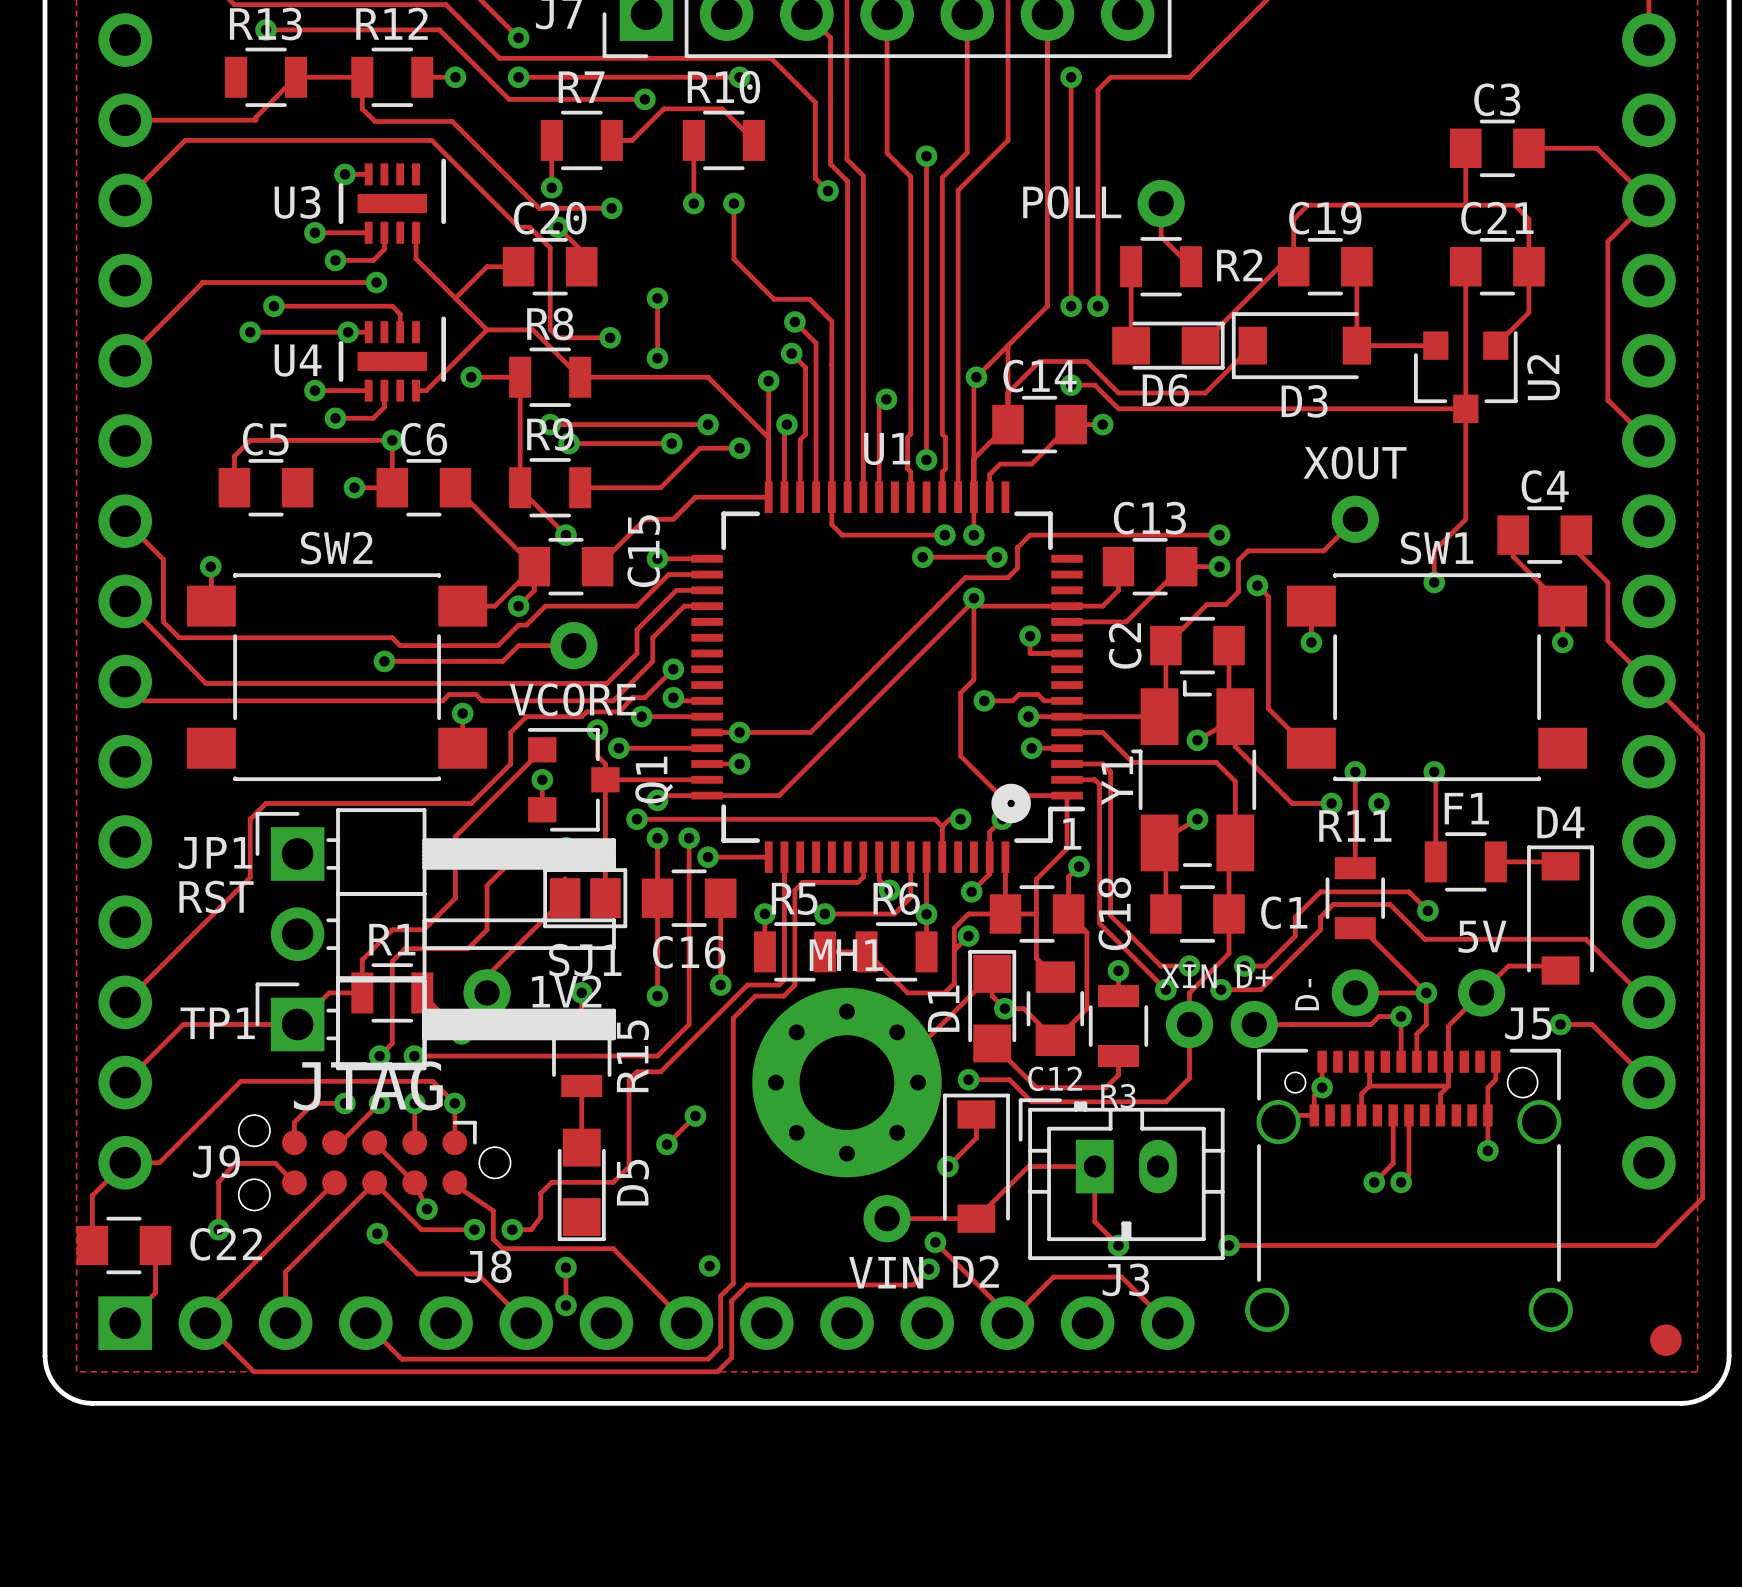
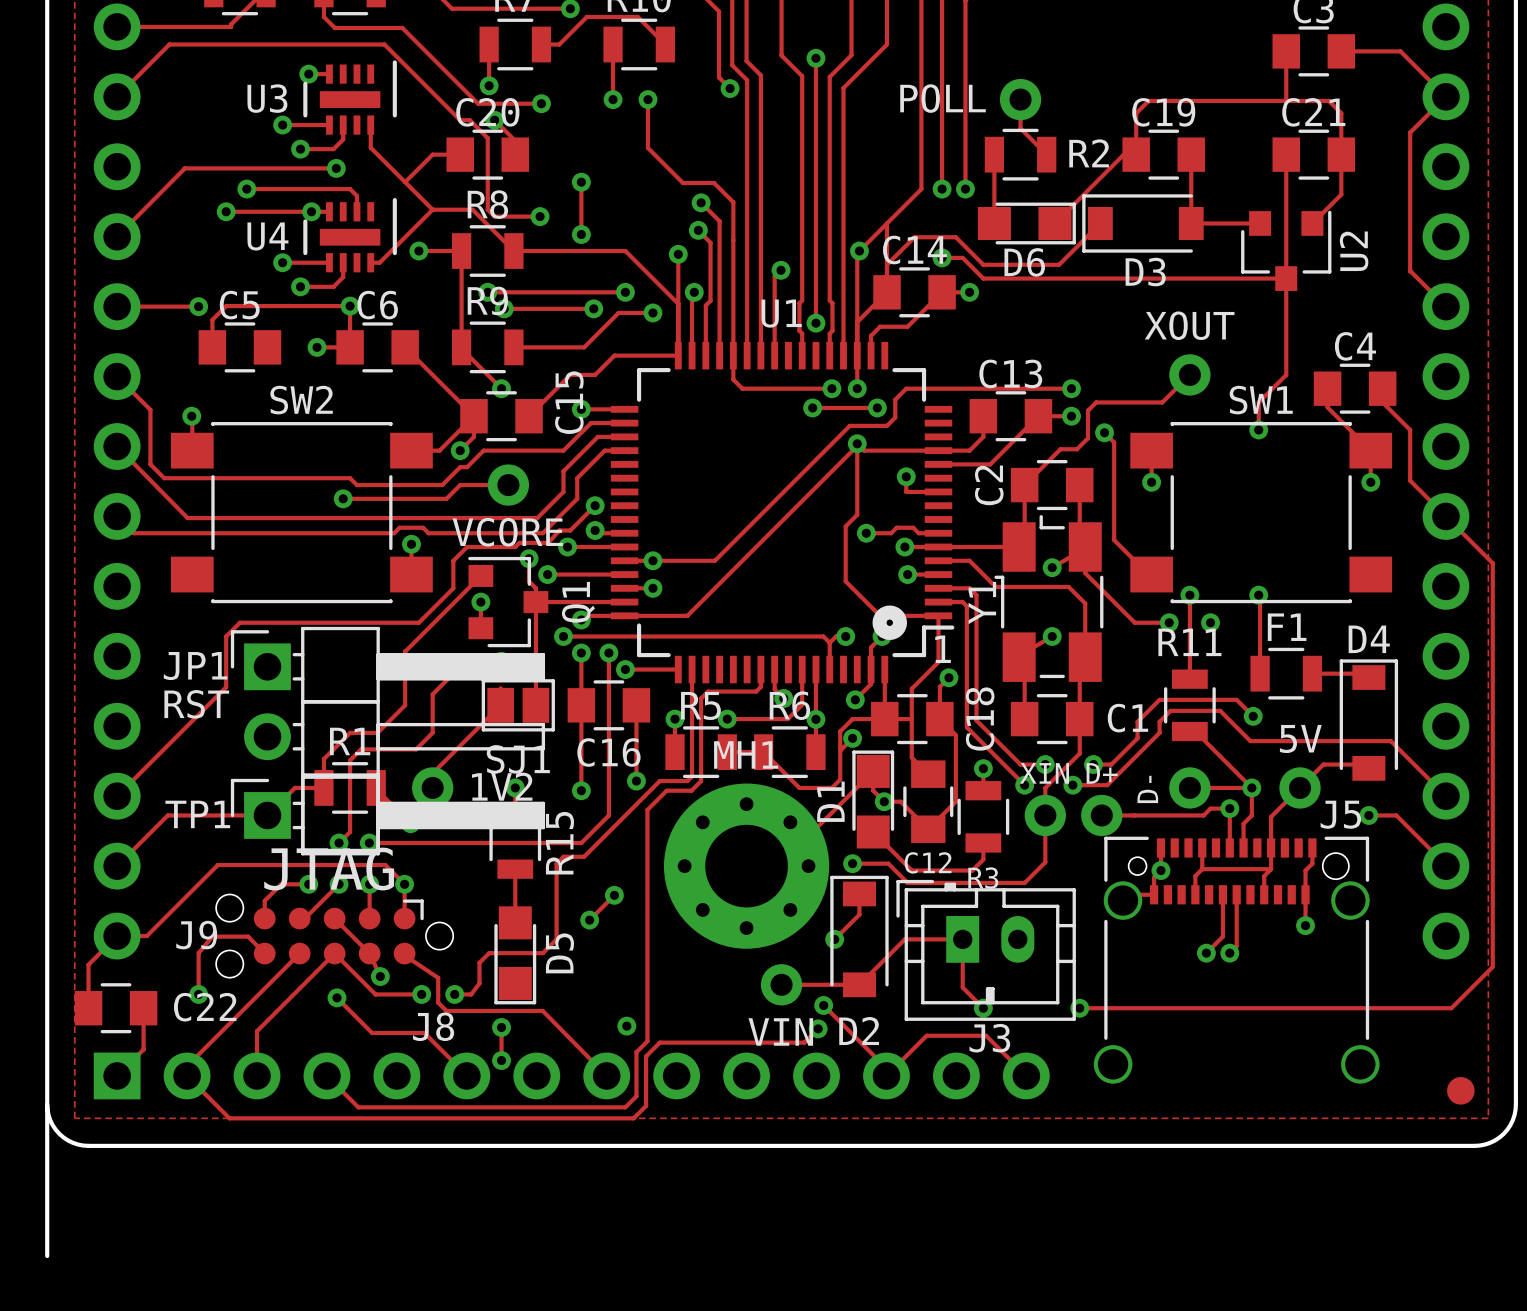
track: none -> (117, 306) (198, 306)
via: none -> (198, 306)
board edge: none -> (47, 1104) (47, 1256)

